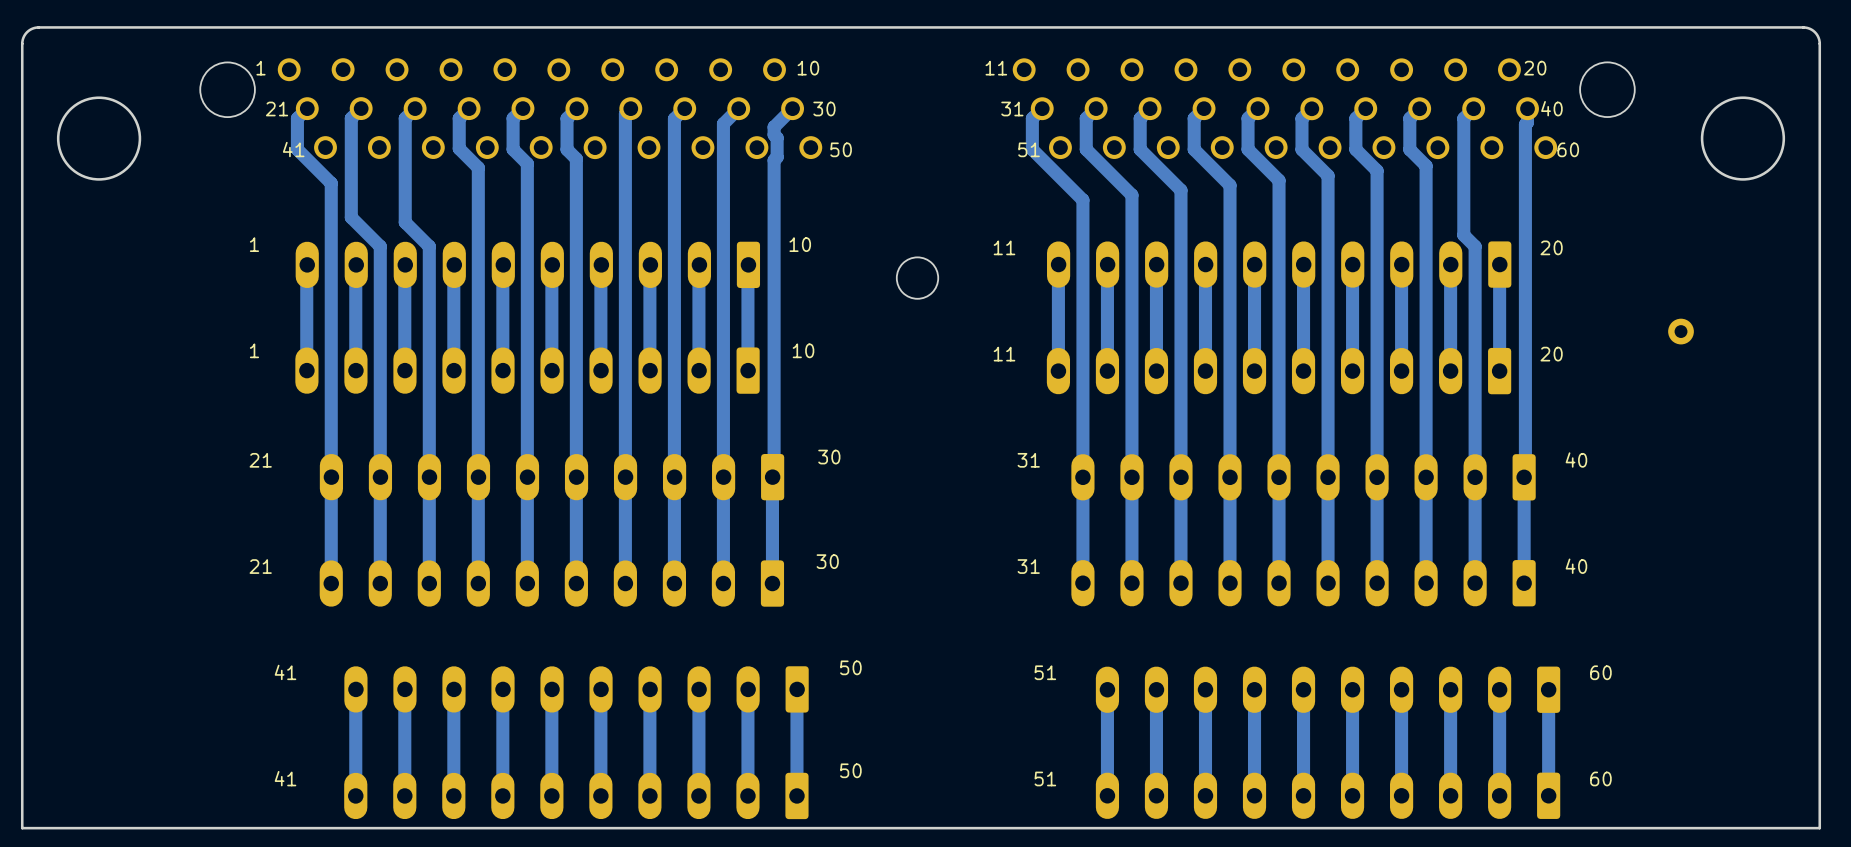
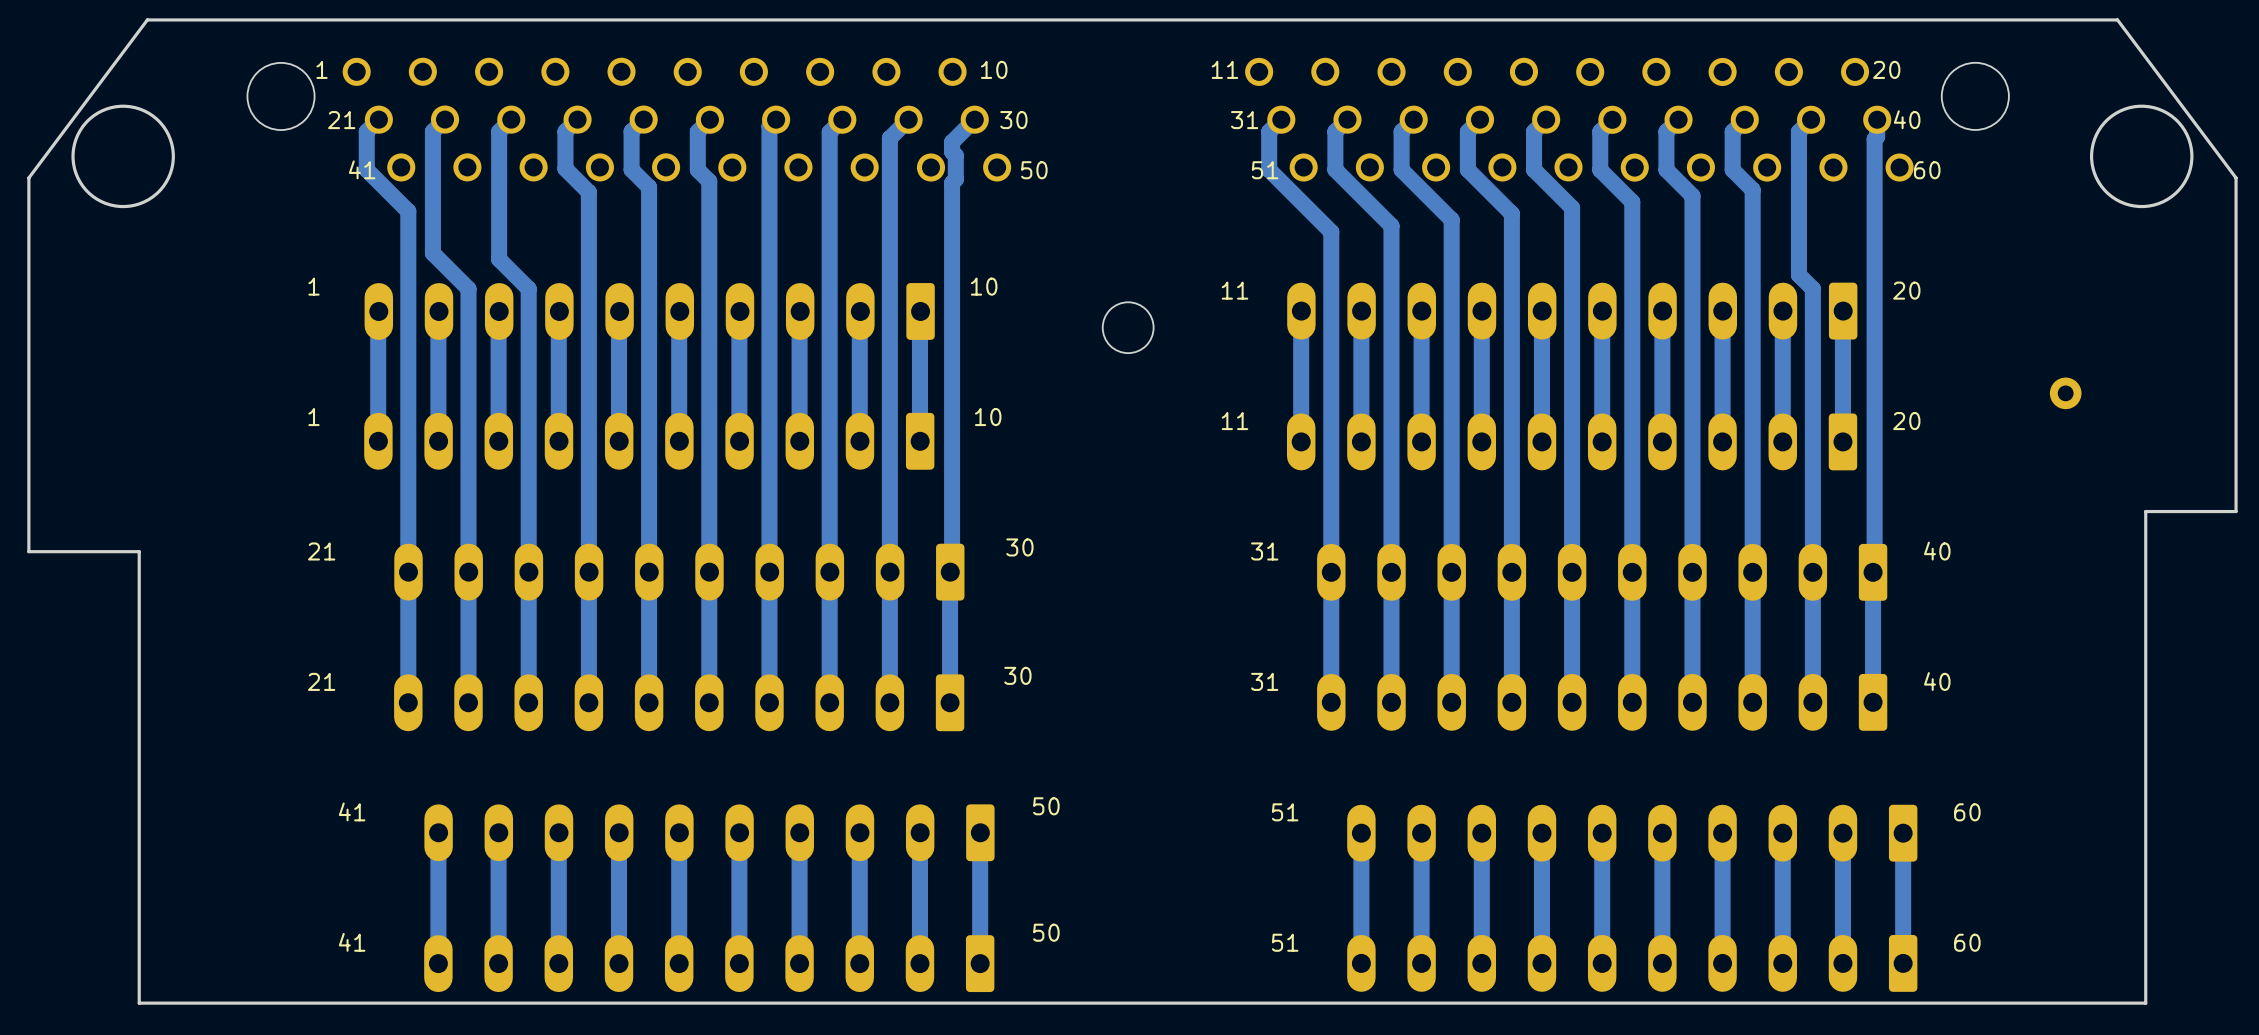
board edge: (38, 27) (28, 30) (22, 41) (22, 156) -> (147, 19) (28, 177)
board edge: (118, 27) (38, 27) -> none
board edge: (1723, 27) (1805, 27) (1816, 33) (1819, 43) -> none
board edge: (1819, 43) (1819, 156) -> (2117, 19) (2236, 177)
board edge: (1819, 427) (1819, 828) (1746, 828) -> (2236, 511) (2145, 511) (2145, 1003)
board edge: (22, 460) (22, 828) (112, 828) -> (28, 551) (139, 551) (139, 1003)

